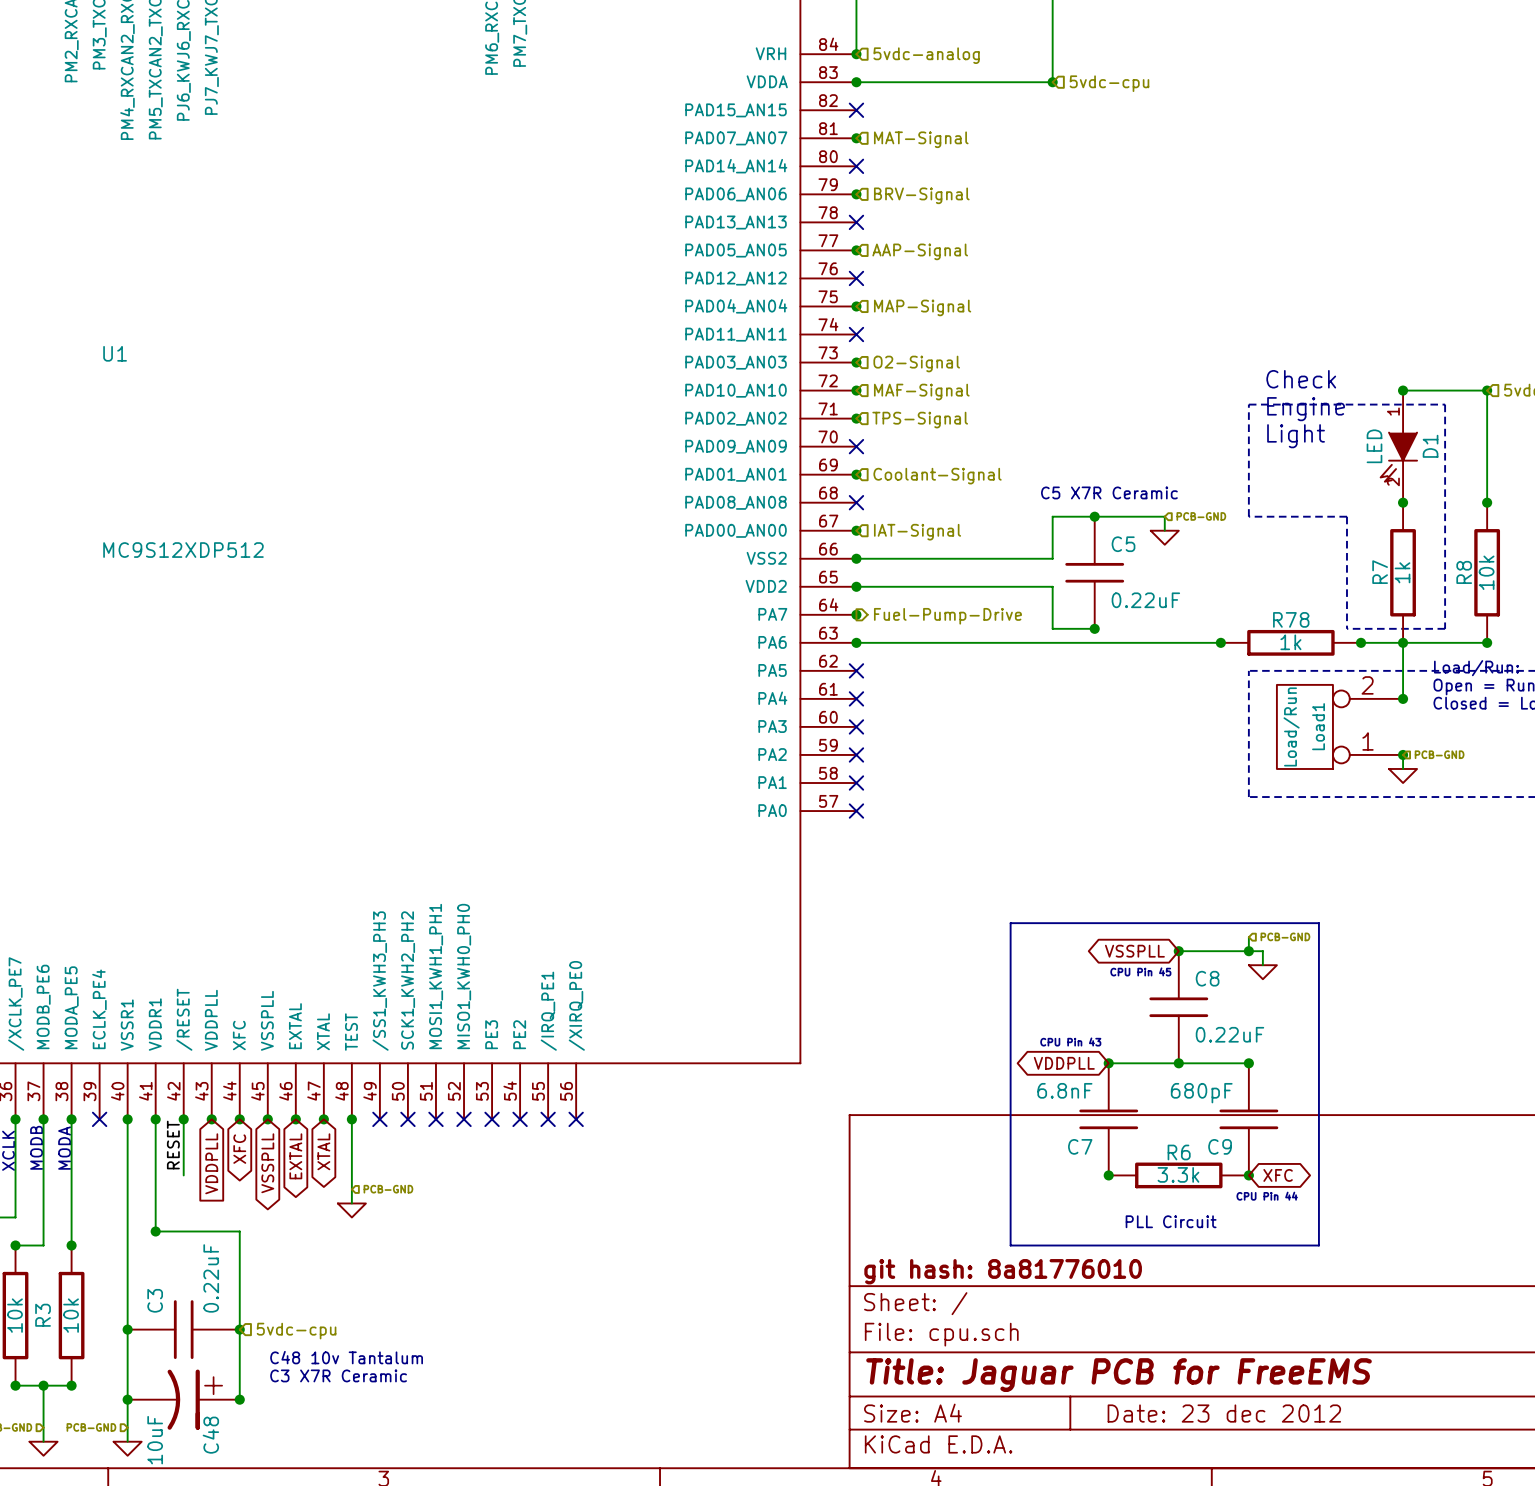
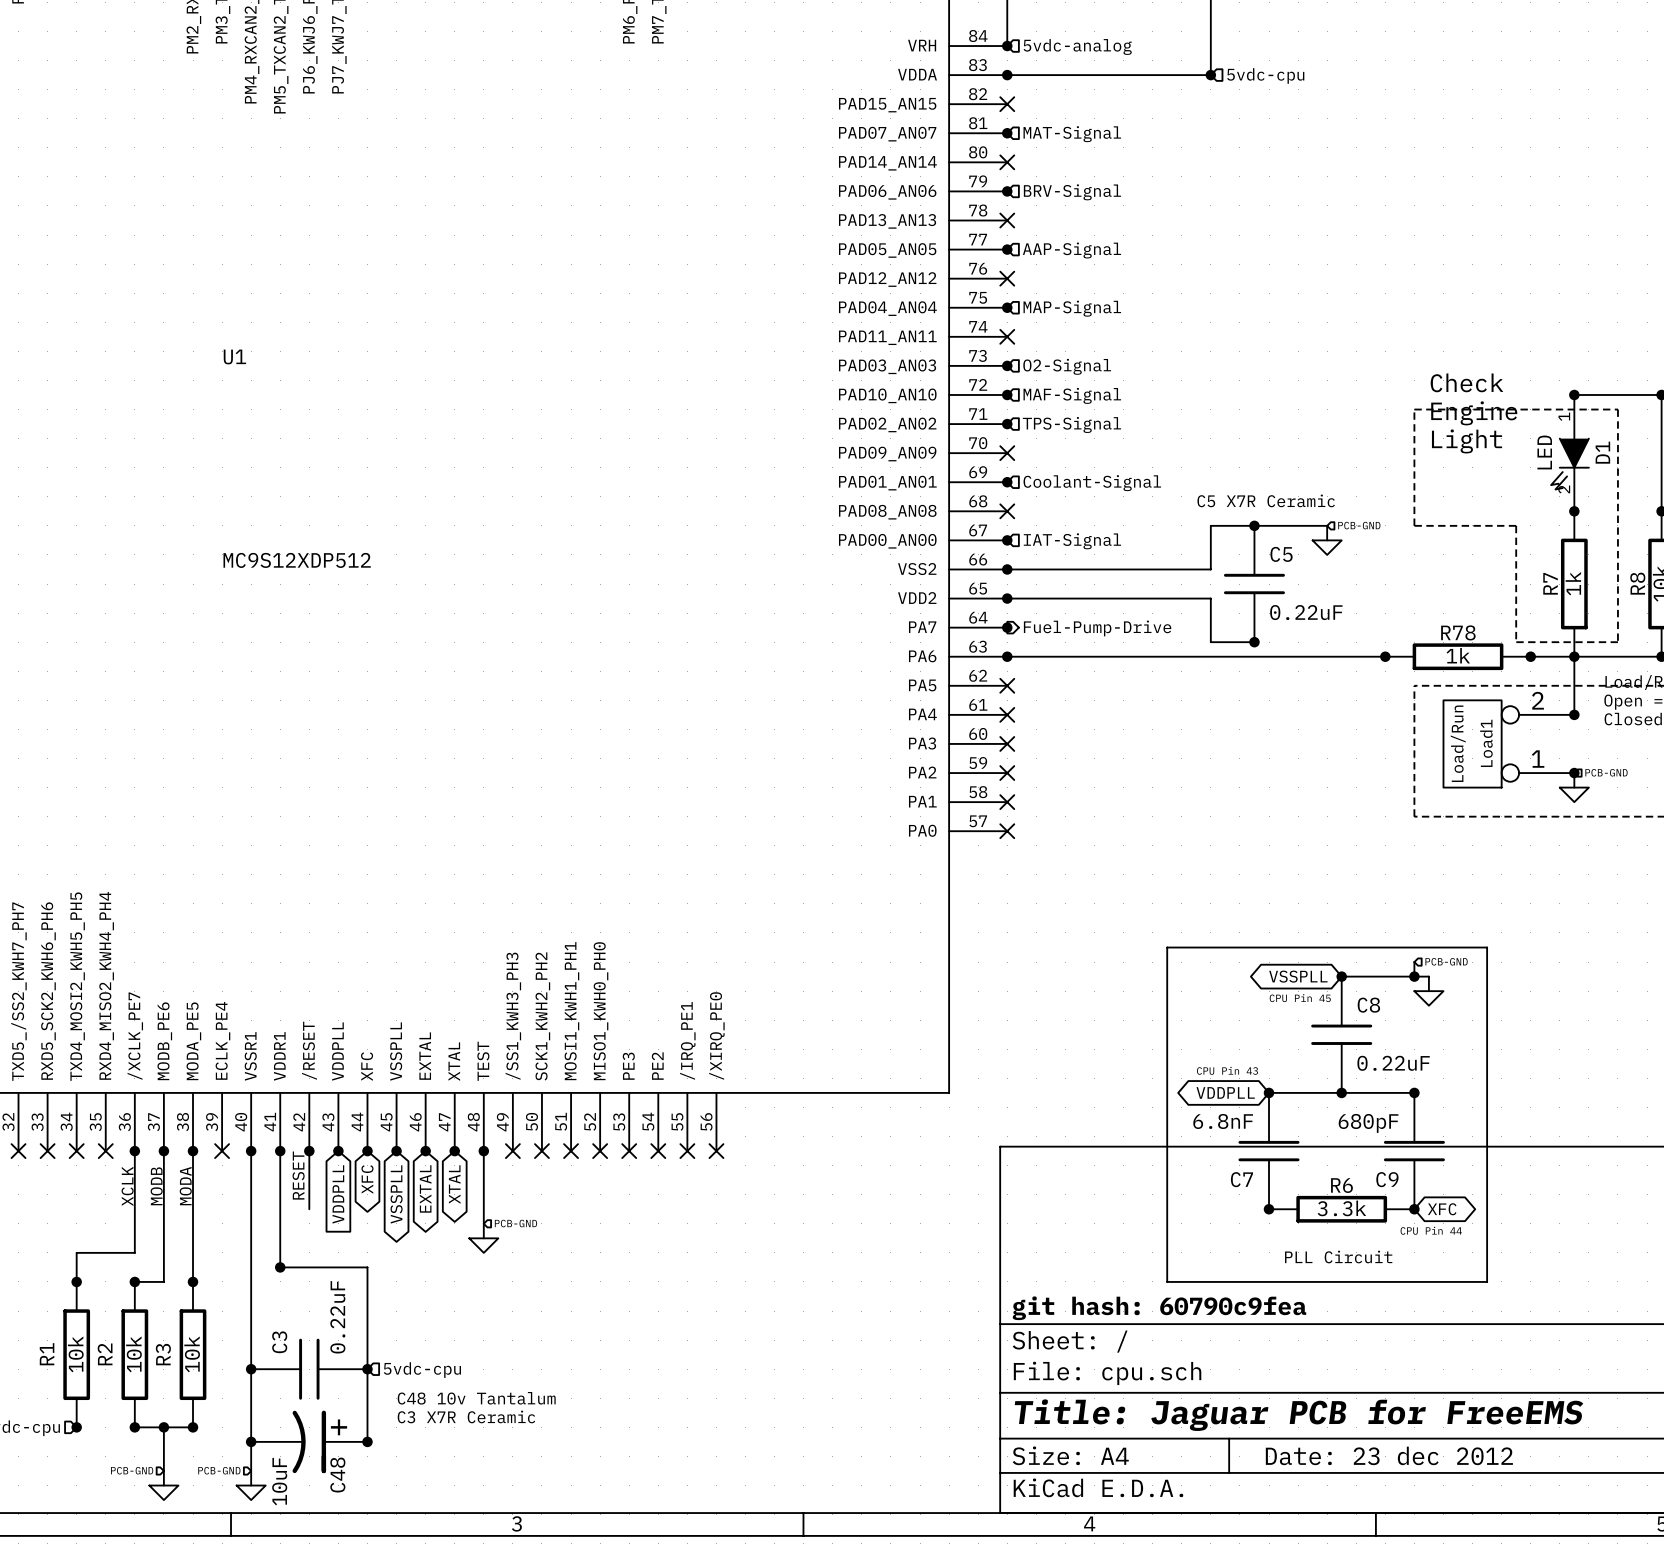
title block: git hash: 8a81776010 (1003, 1271) -> git hash: 60790c9fea (1159, 1308)

